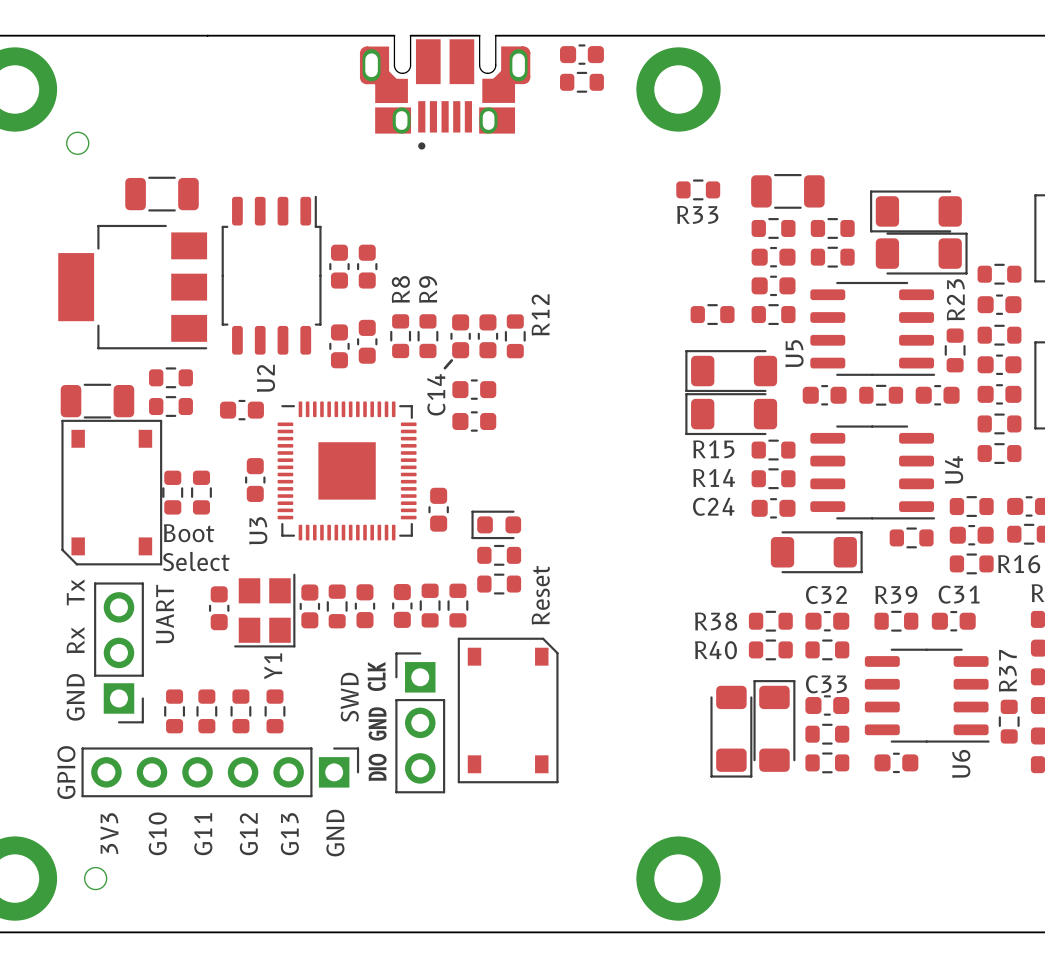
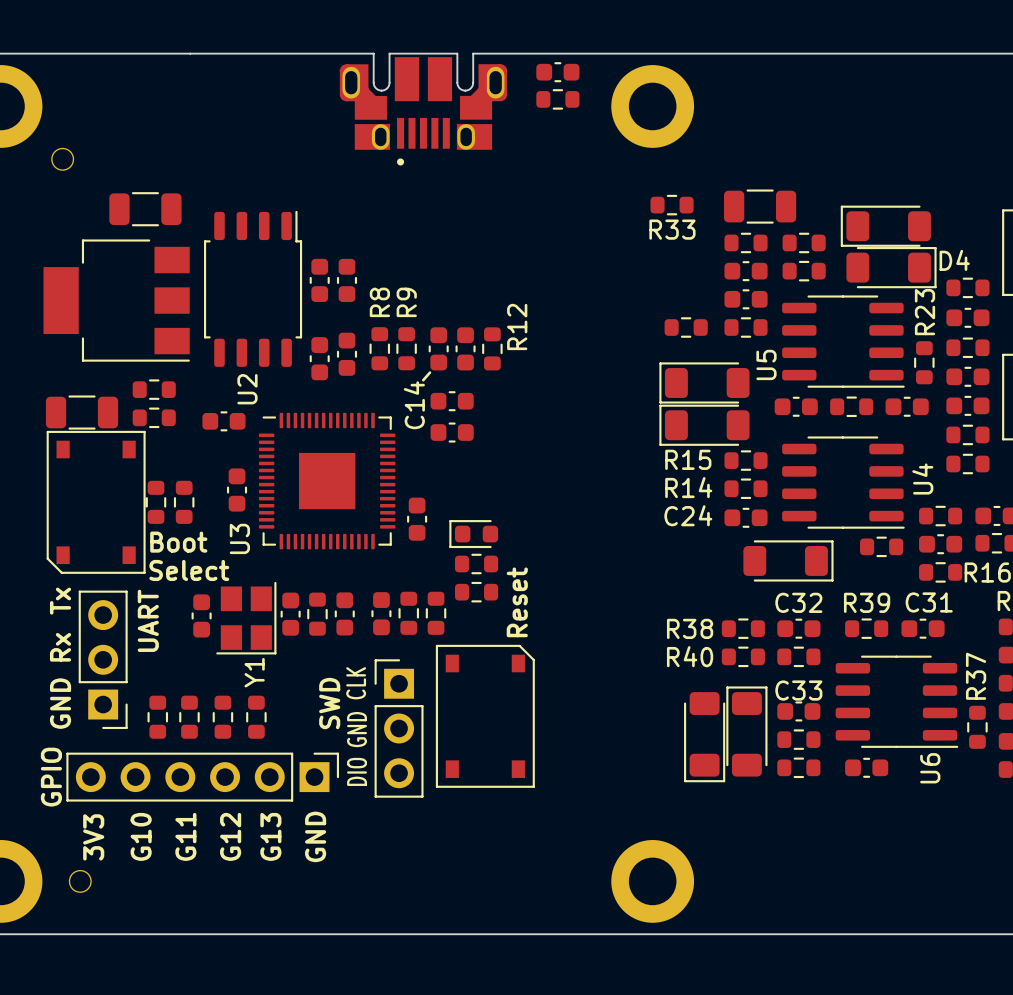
D4 name: none -> D4 (954, 260)

